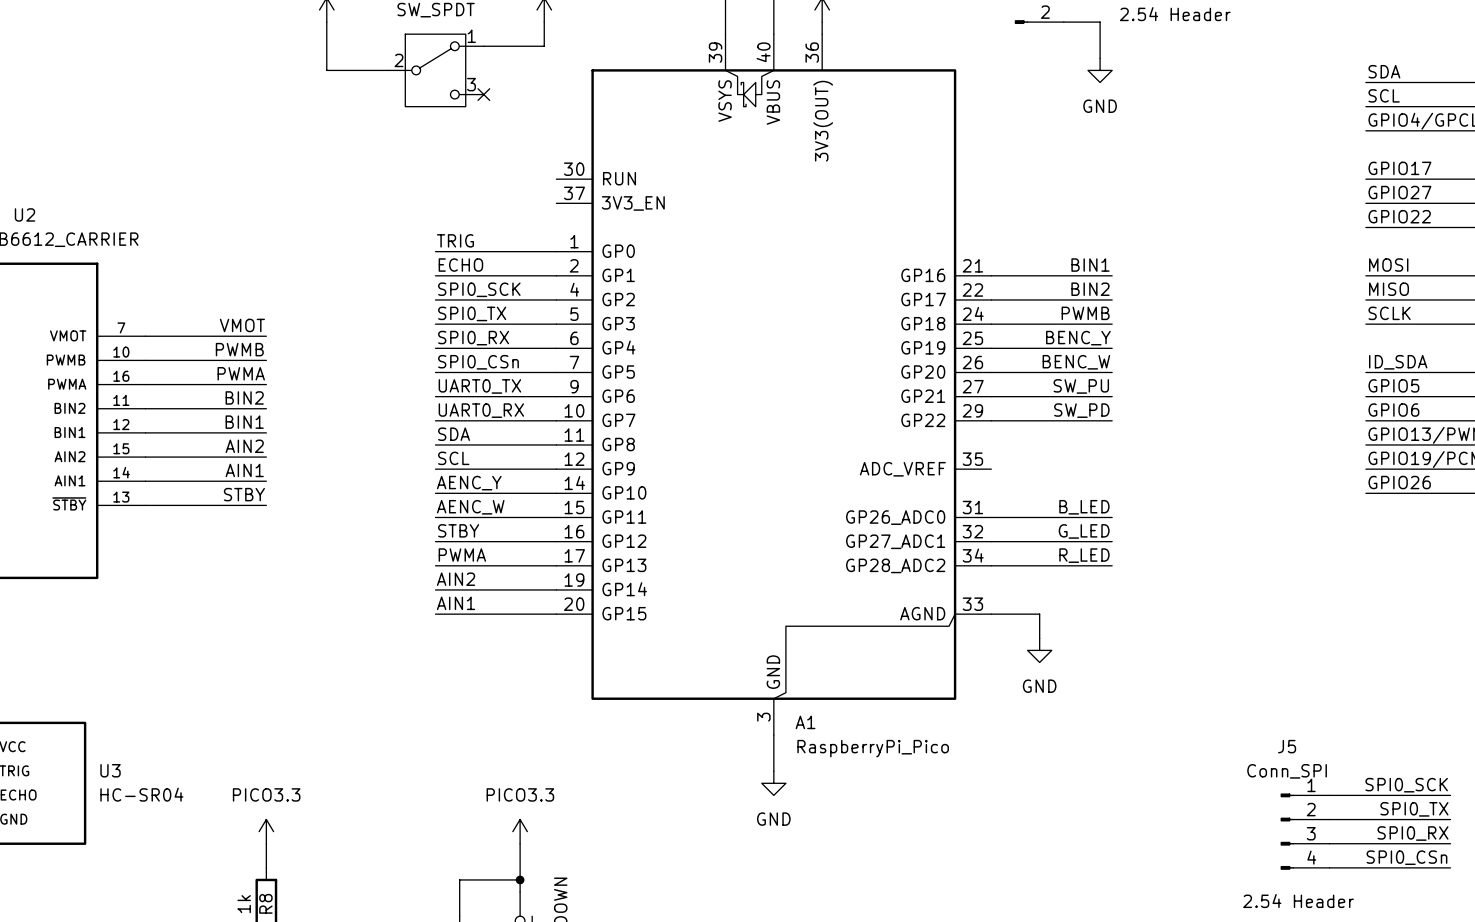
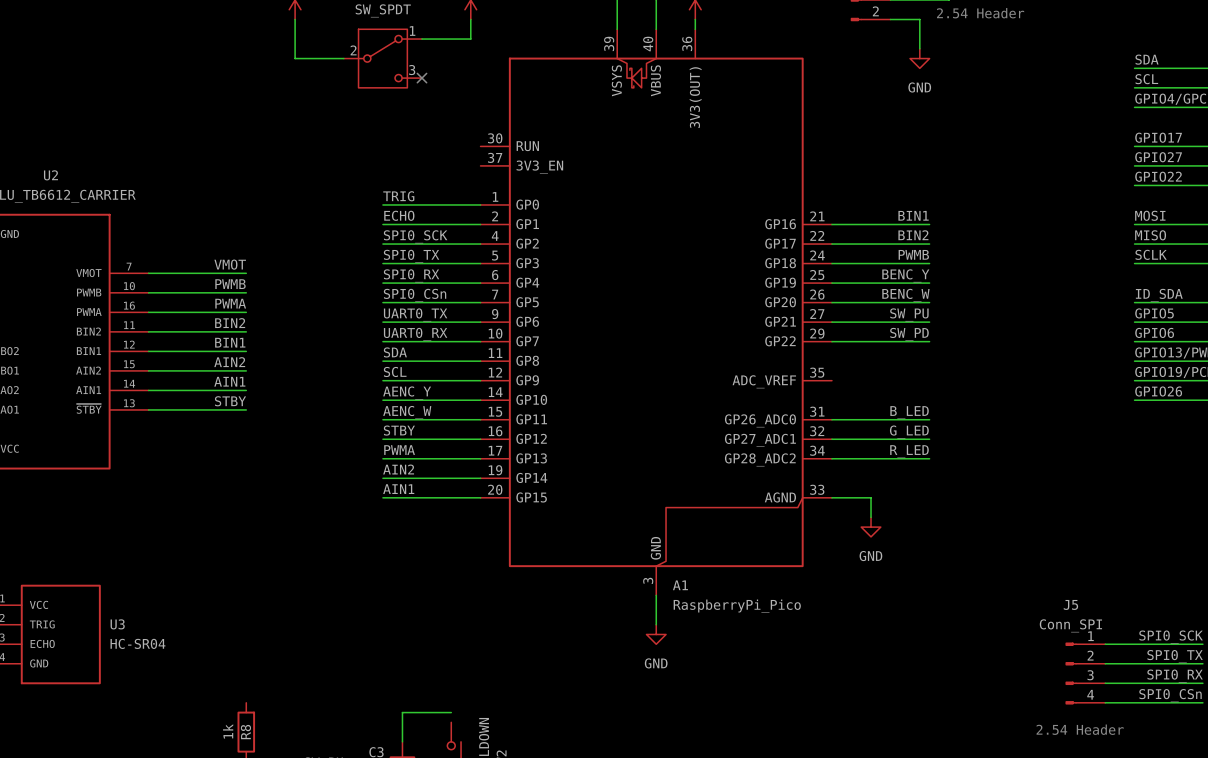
power symbol: PICO3.3 (266, 831) -> none
power symbol: PICO3.3 (520, 831) -> none
wire: (266, 843) (266, 867) -> none
wire: (520, 843) (520, 892) -> none
junction: (520, 879) -> none

